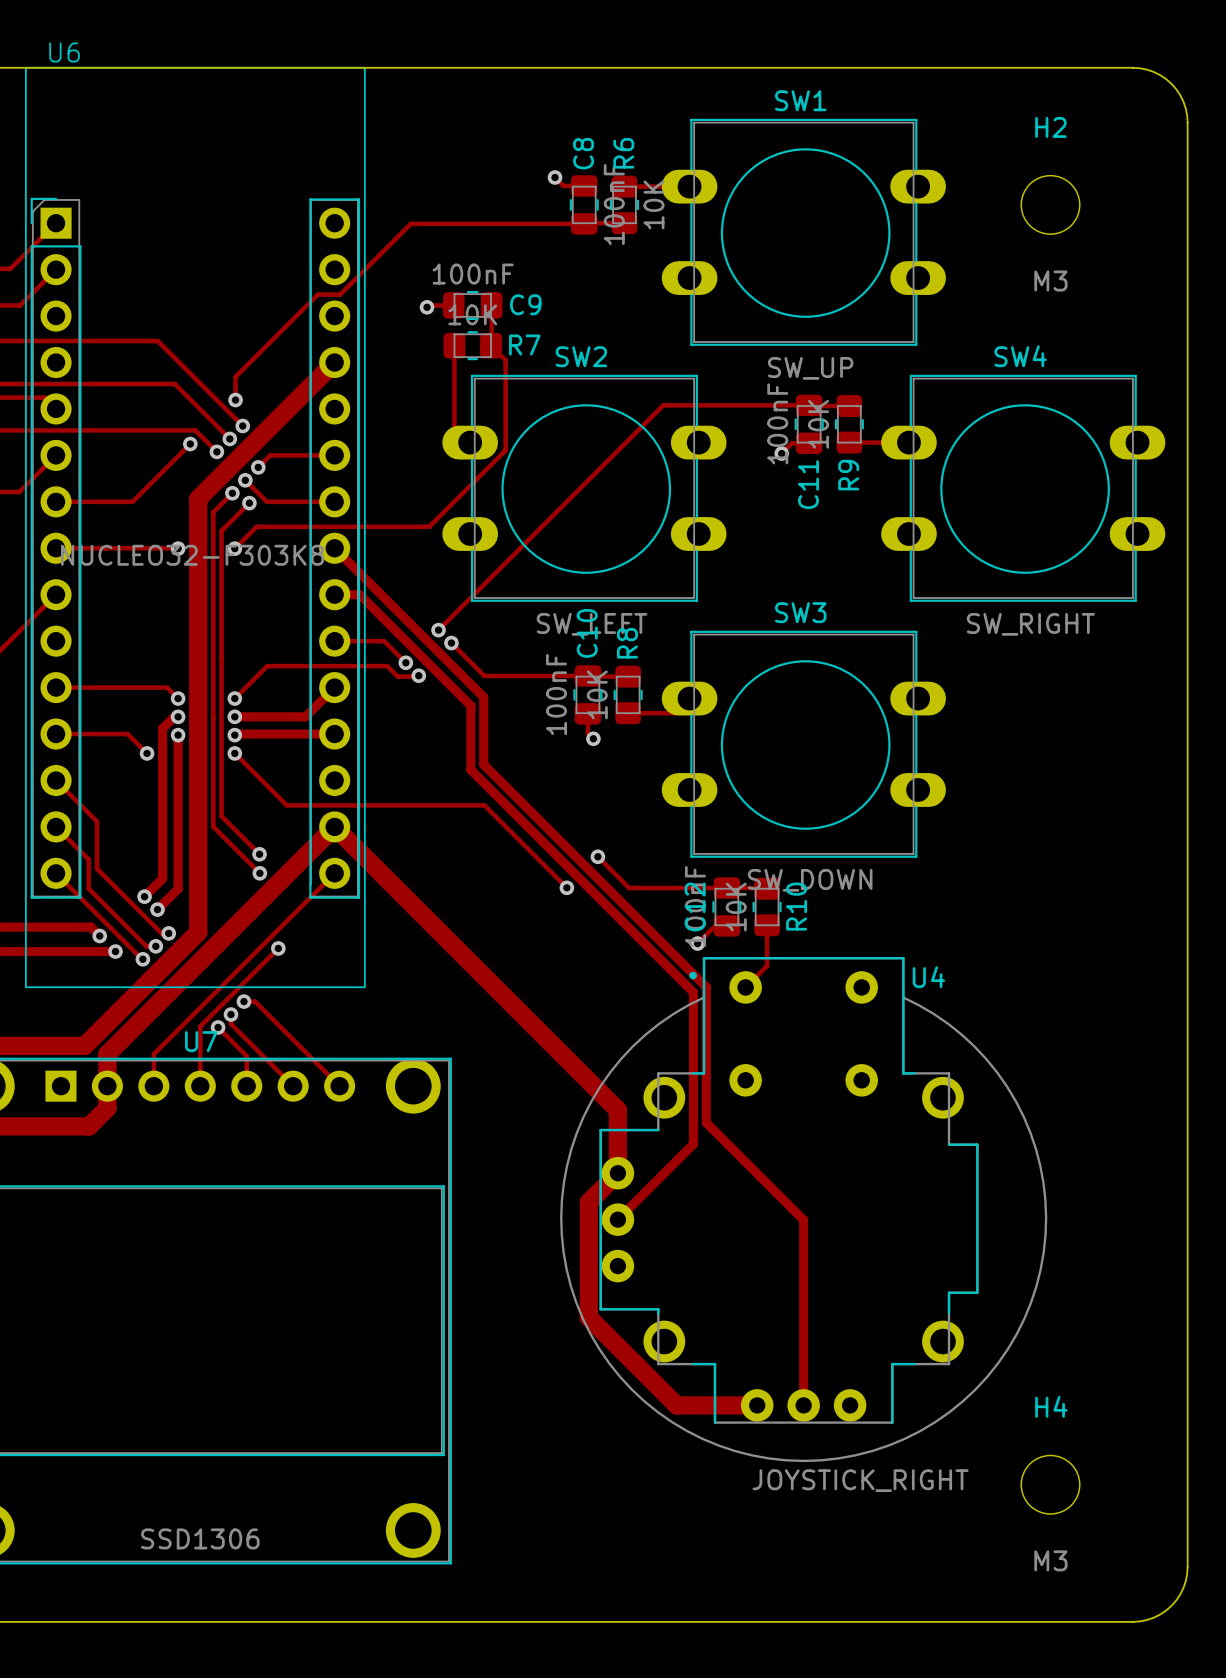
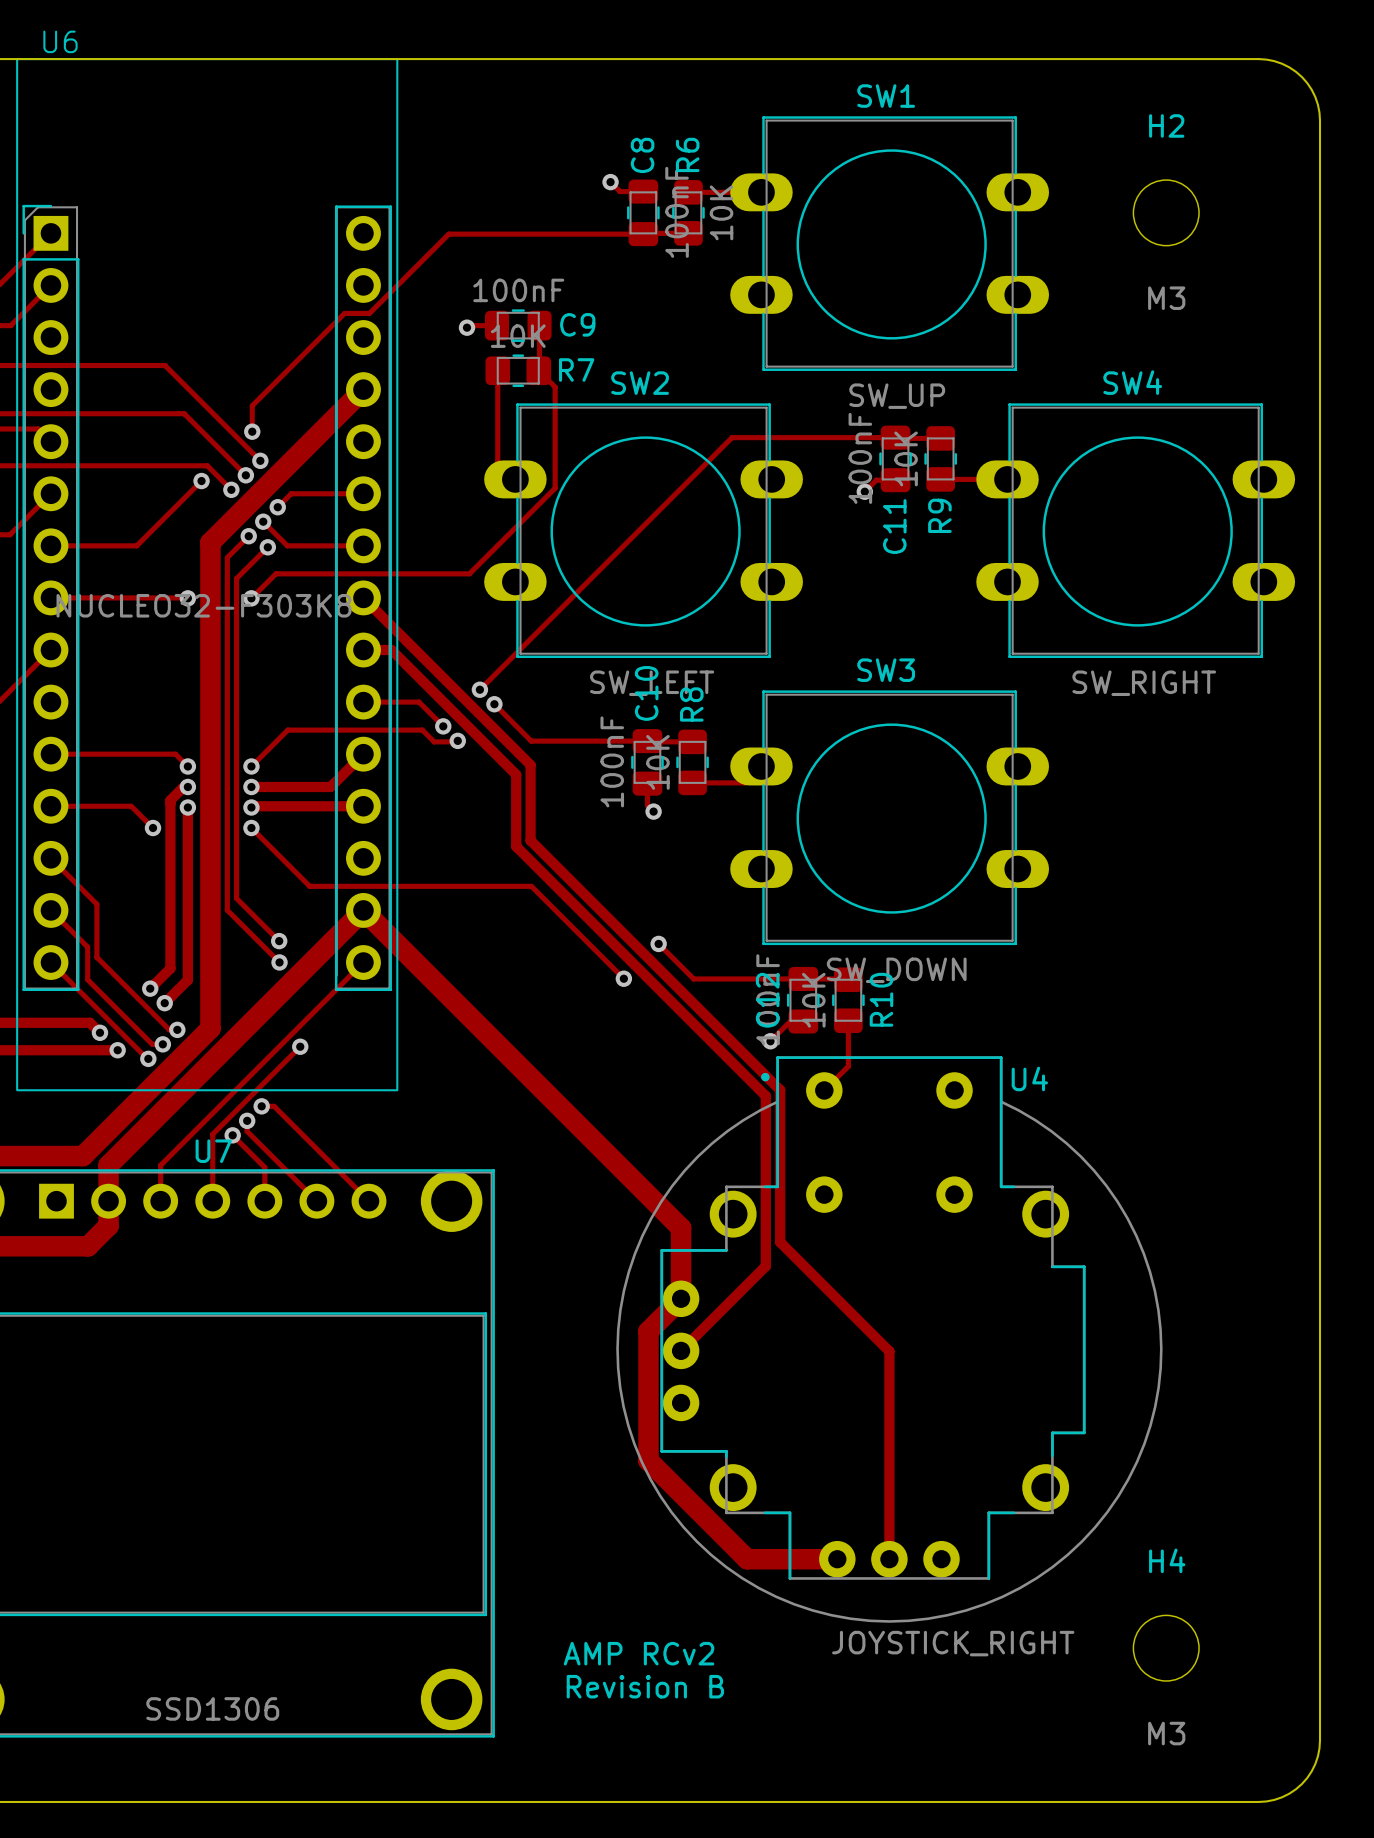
text: none -> AMP RCv2 (639, 1653)
text: none -> Revision B (645, 1686)

